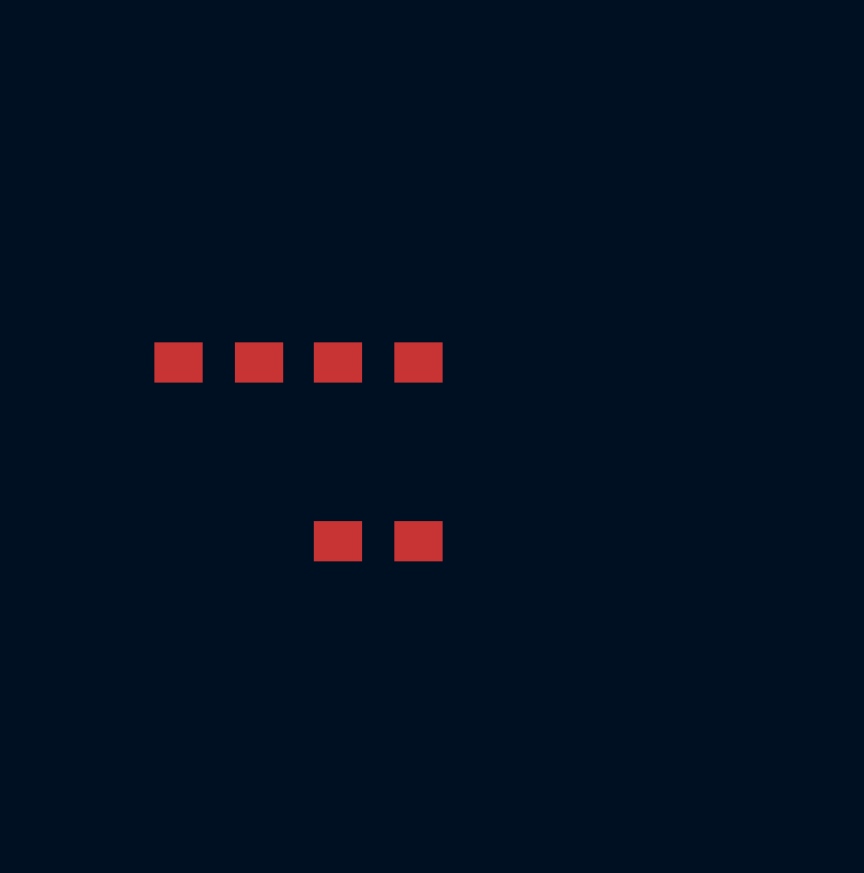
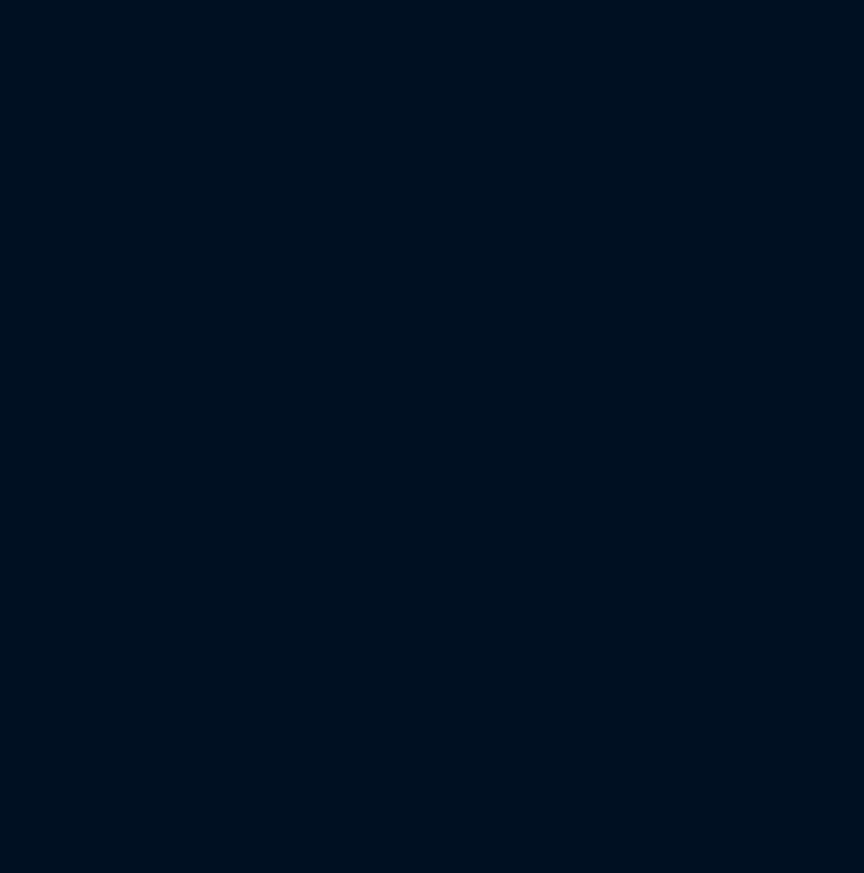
part: (218, 362) -> none
part: (378, 362) -> none
part: (378, 541) -> none

